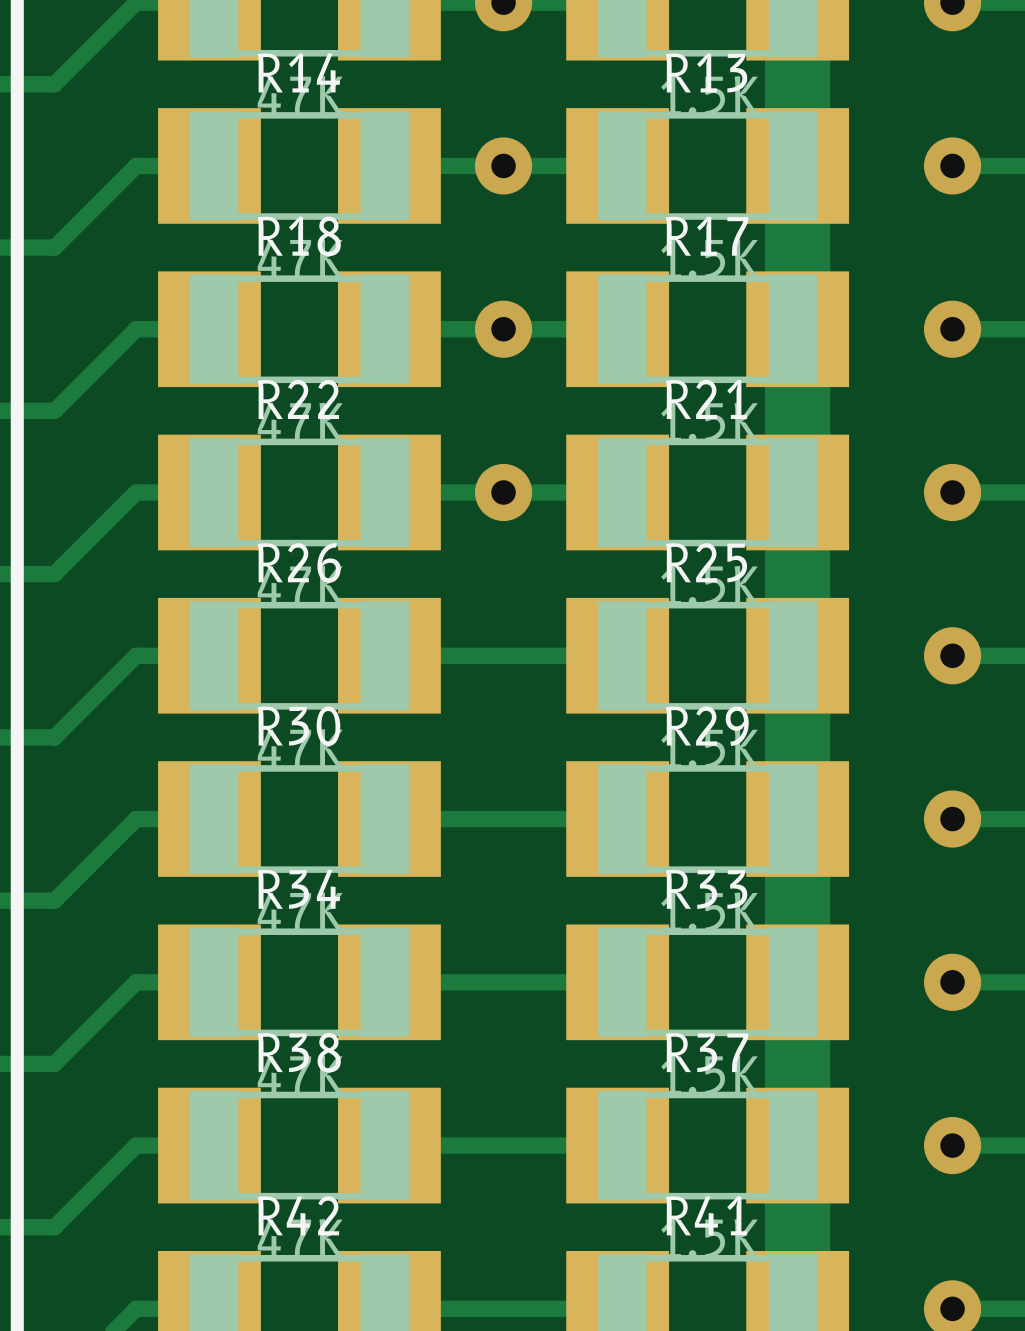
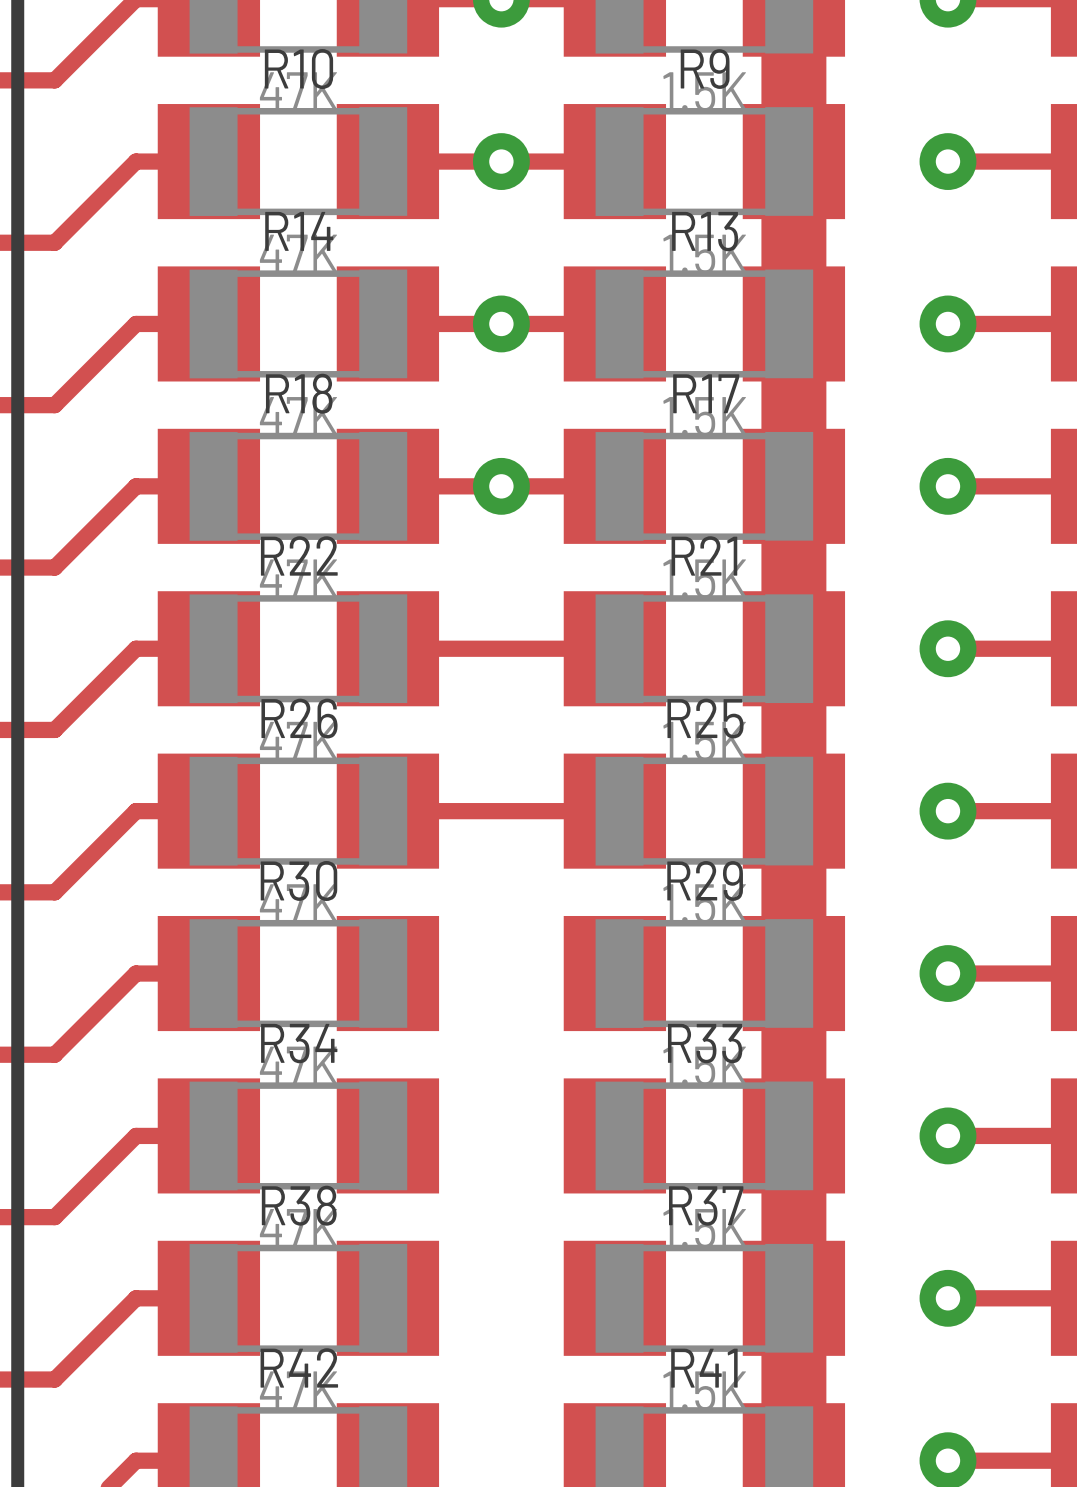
via: (503, 492) -> none
track: (389, 819) (617, 819) -> none
track: (389, 982) (617, 982) -> none
track: (389, 1145) (617, 1145) -> none
track: (389, 1308) (617, 1308) -> none

